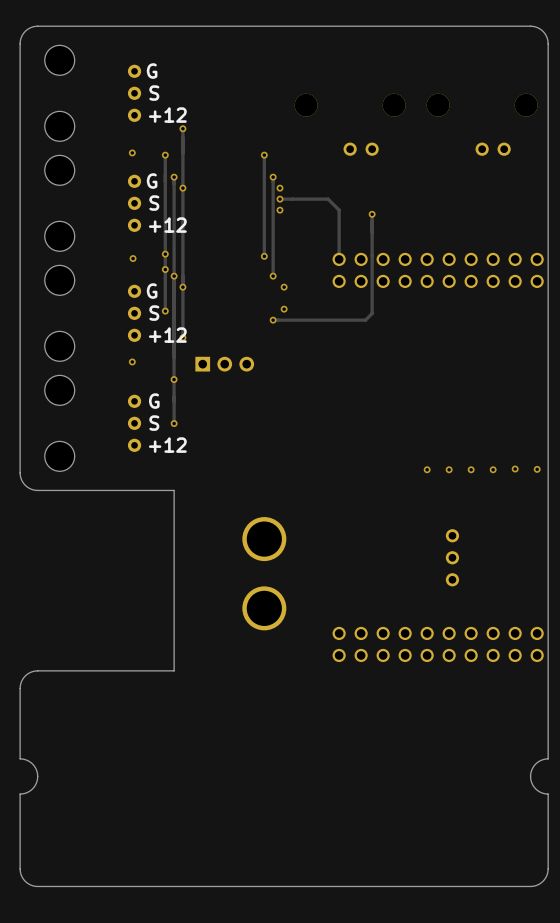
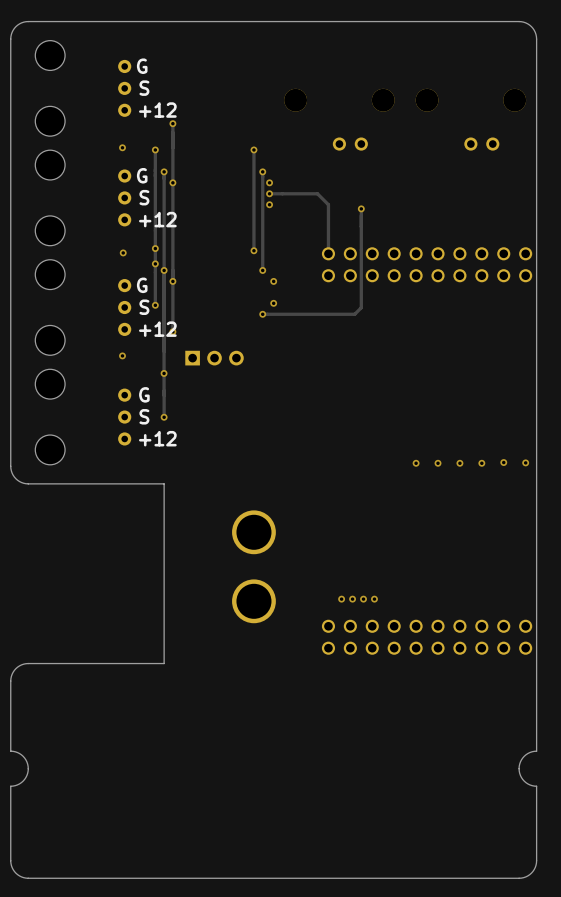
part: (452, 557) -> none
via: none -> (341, 599)
via: none -> (352, 599)
via: none -> (363, 599)
via: none -> (374, 599)

